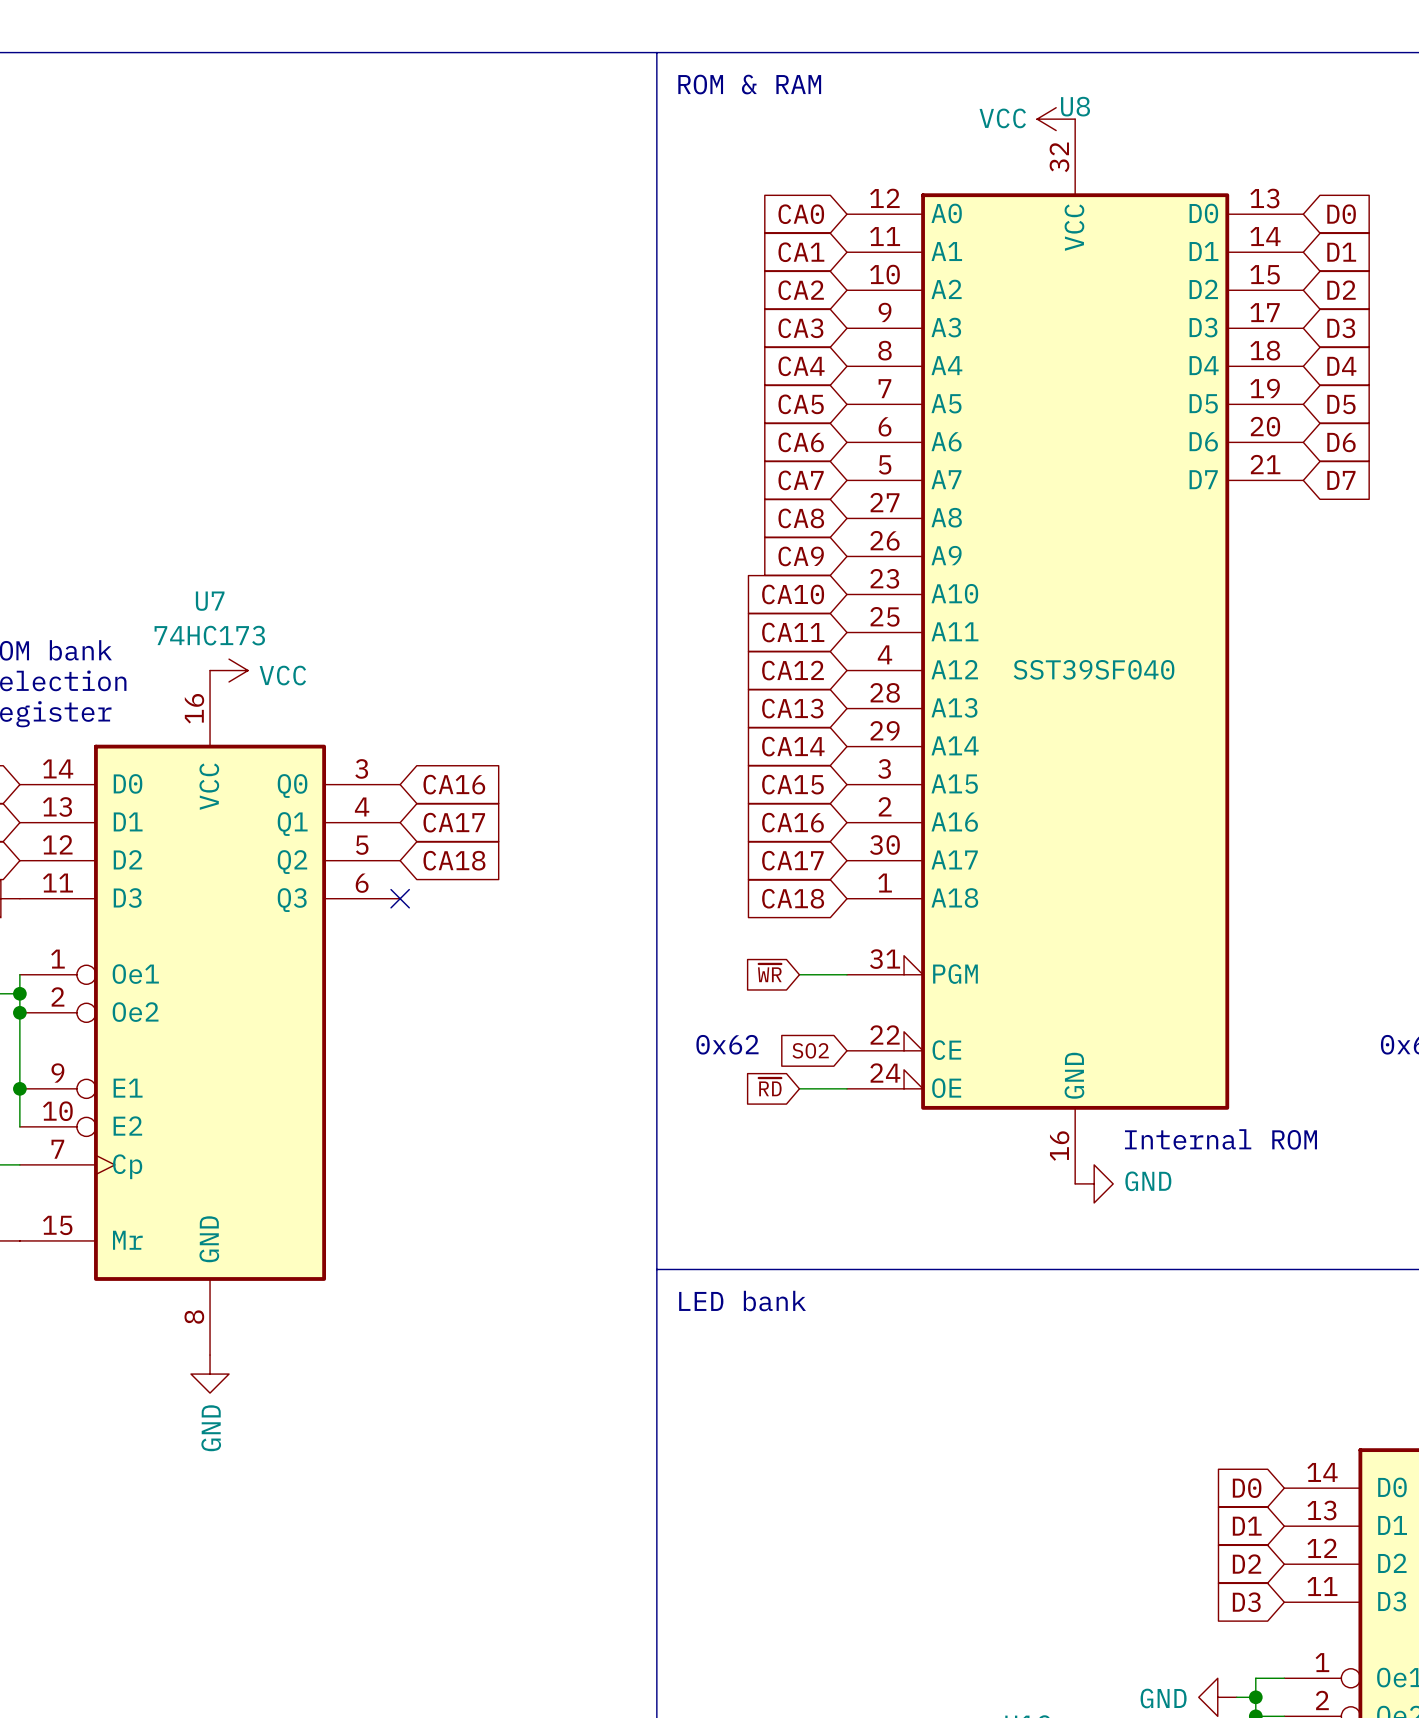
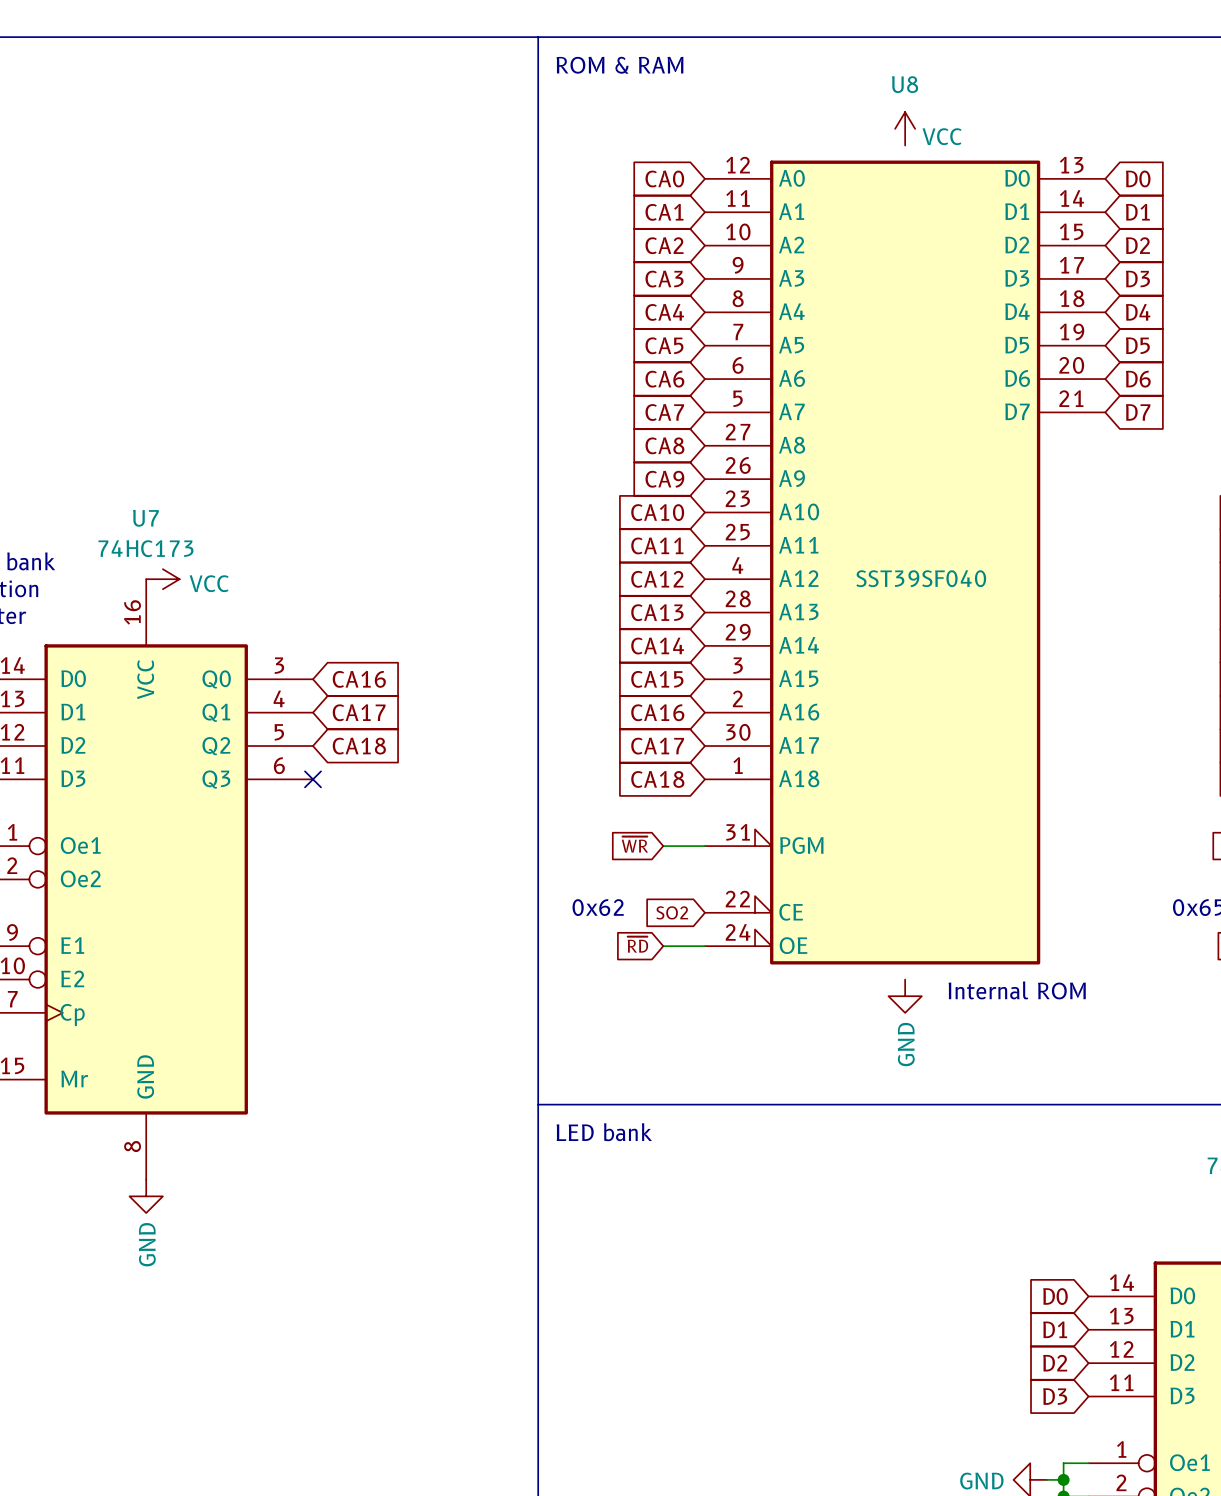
power symbol text position: VCC (1002, 118) -> VCC (942, 136)
U8 symbol: [846, 119, 1304, 1184] -> [704, 160, 1106, 965]
power symbol rotation: 0° (1056, 119) -> 90° clockwise (905, 128)
power symbol position: VCC (1056, 119) -> VCC (905, 128)
power symbol rotation: 0° (1094, 1183) -> 90° clockwise (905, 996)
power symbol position: GND (1094, 1183) -> GND (905, 996)

